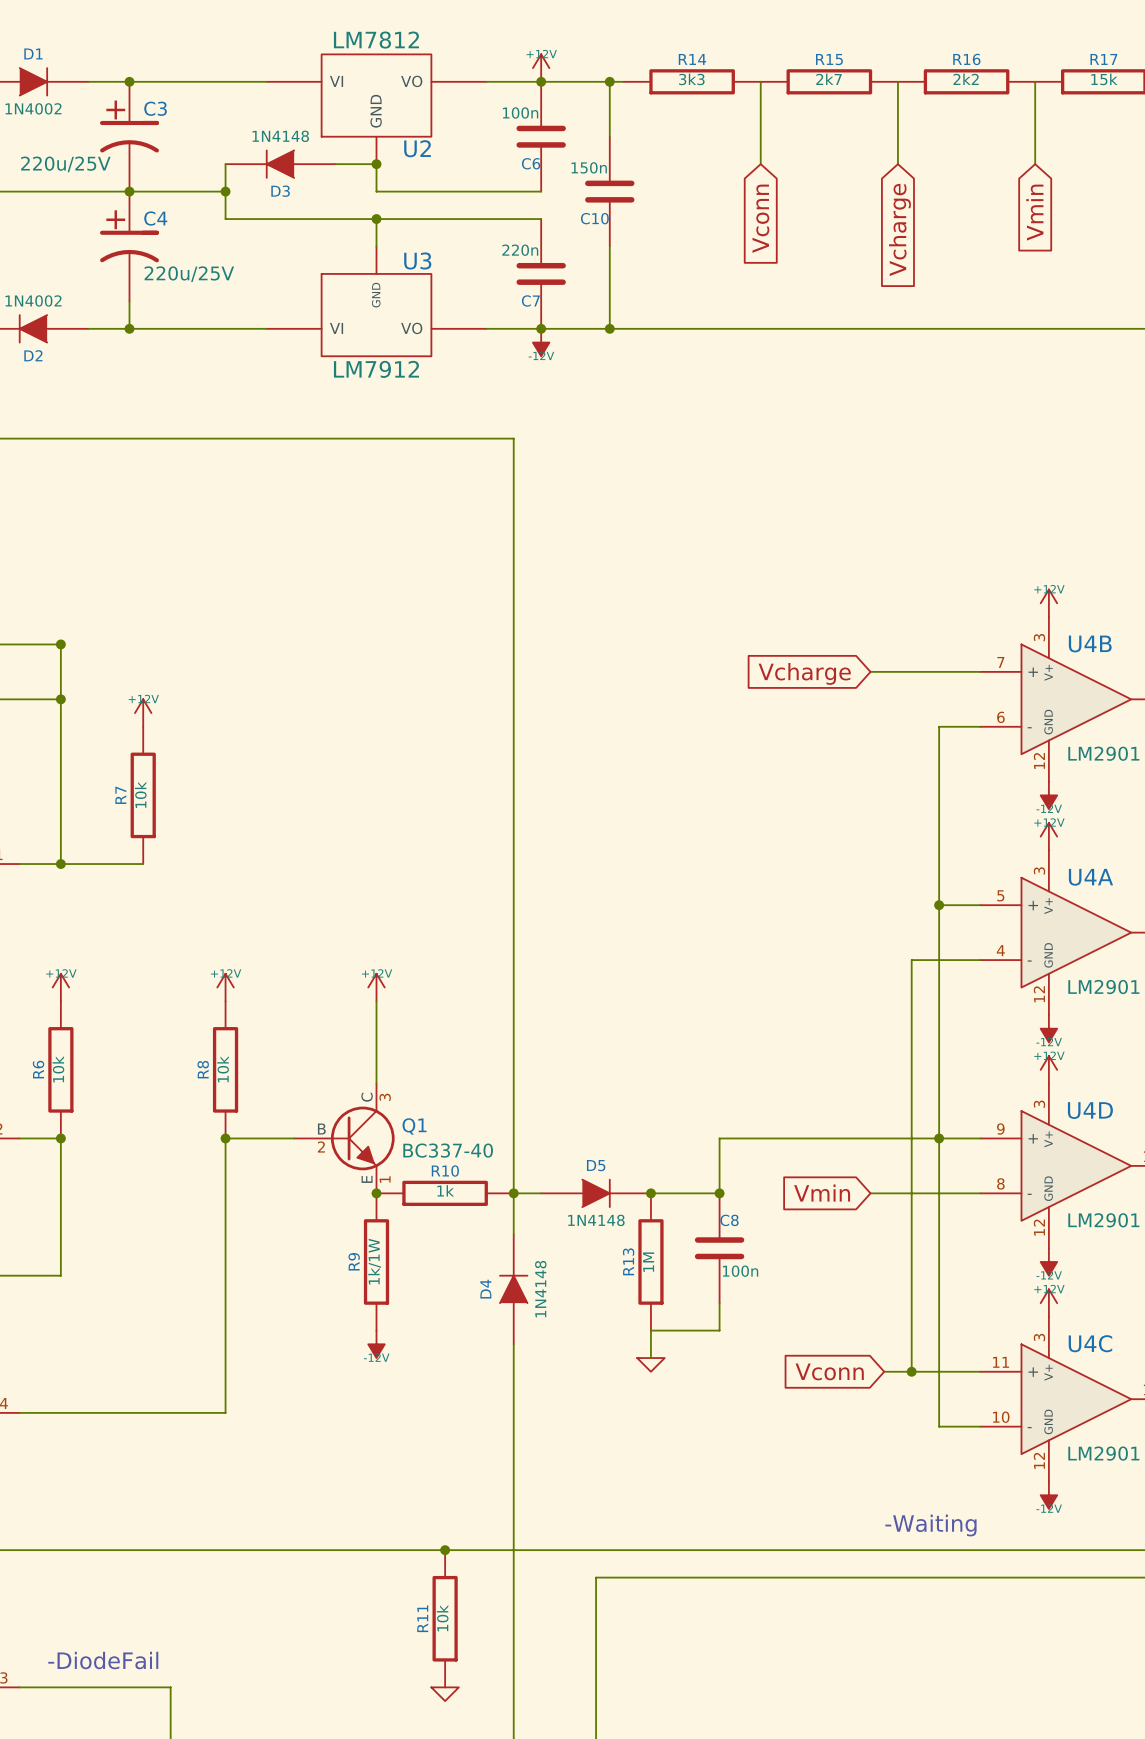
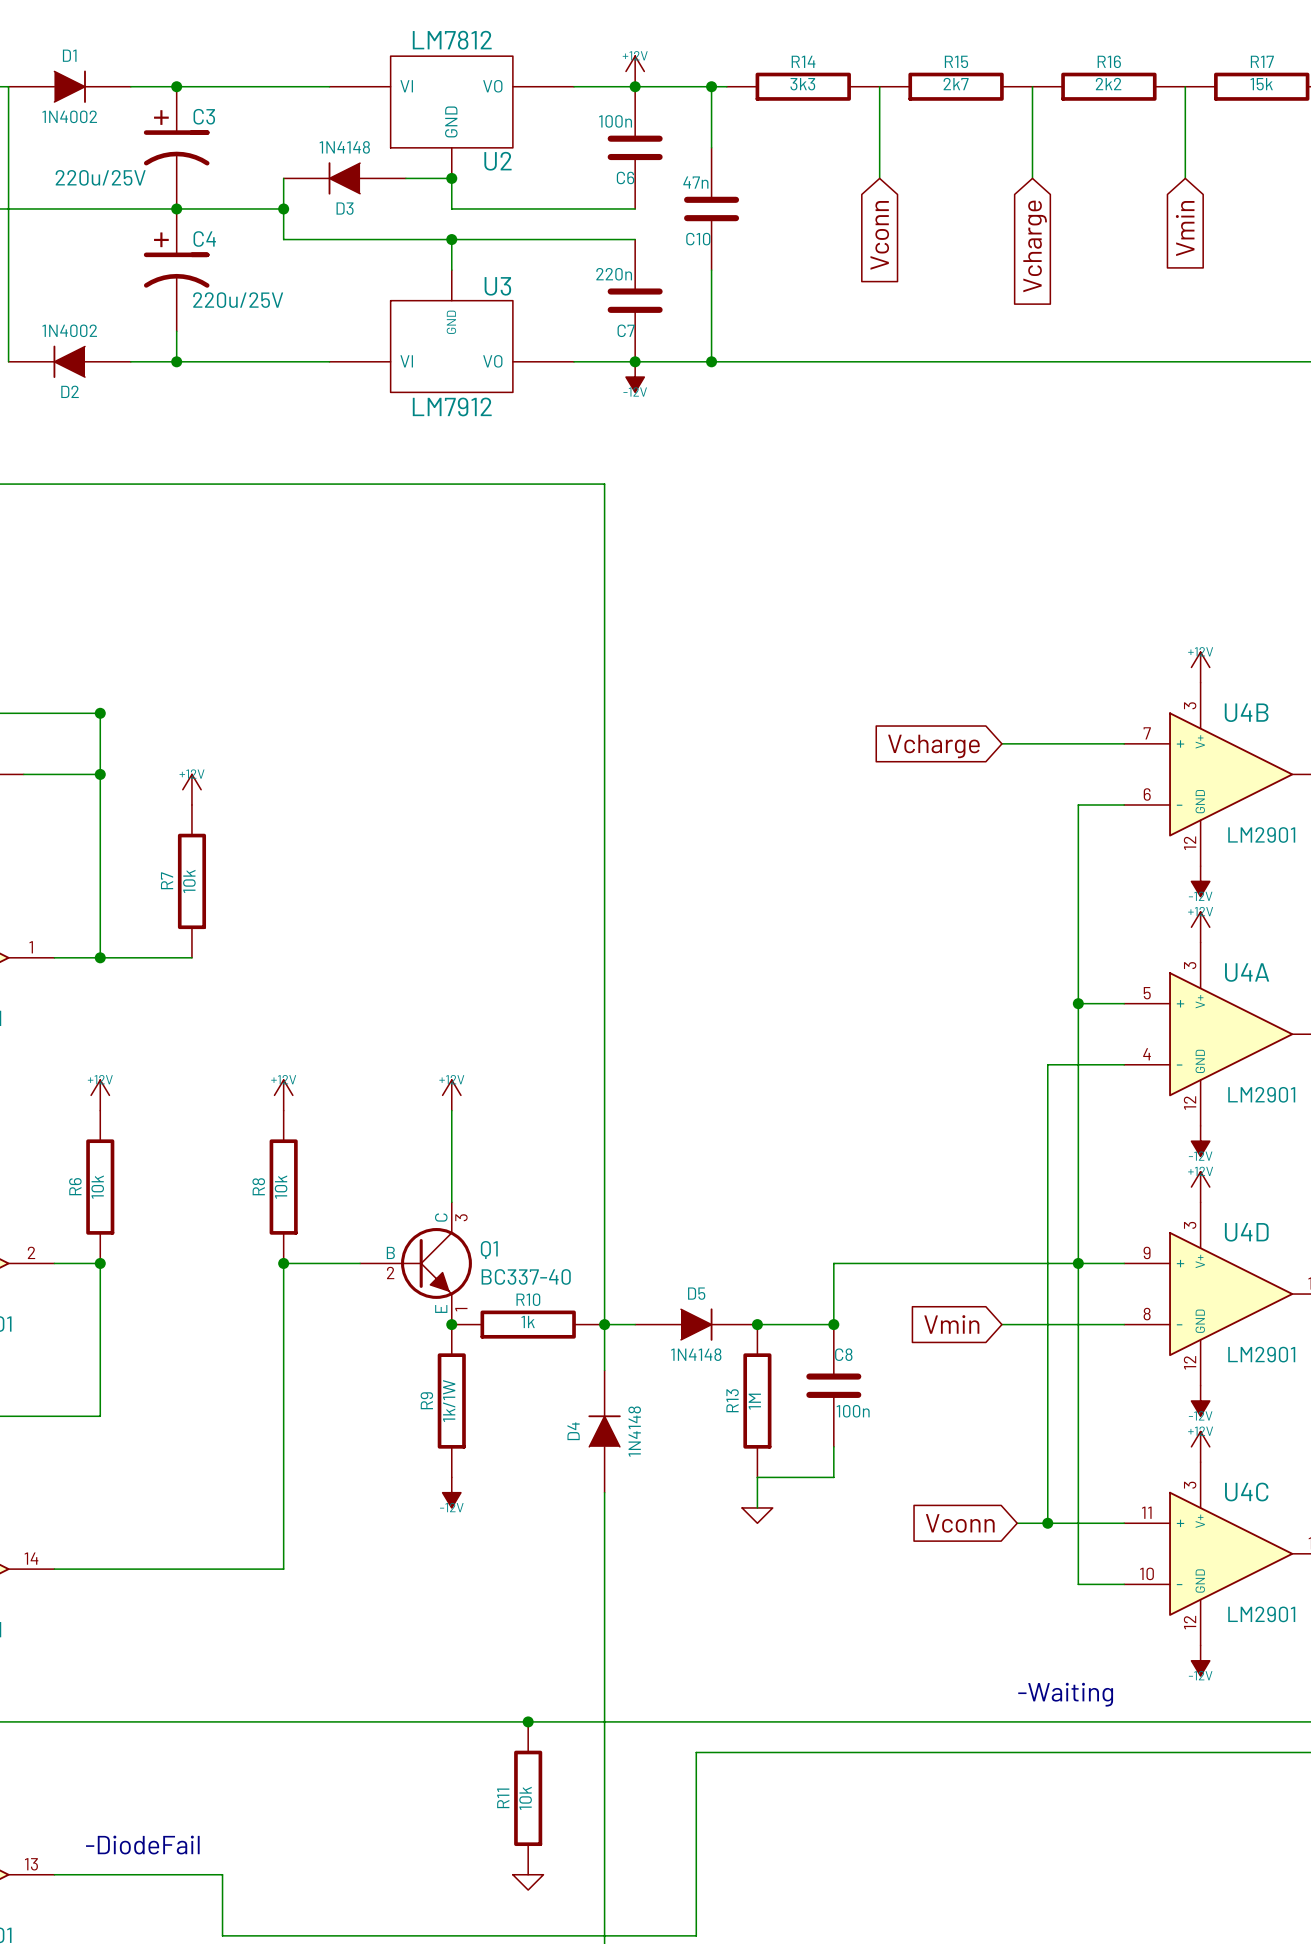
C10 value: 150n (589, 167) -> 47n (695, 182)

